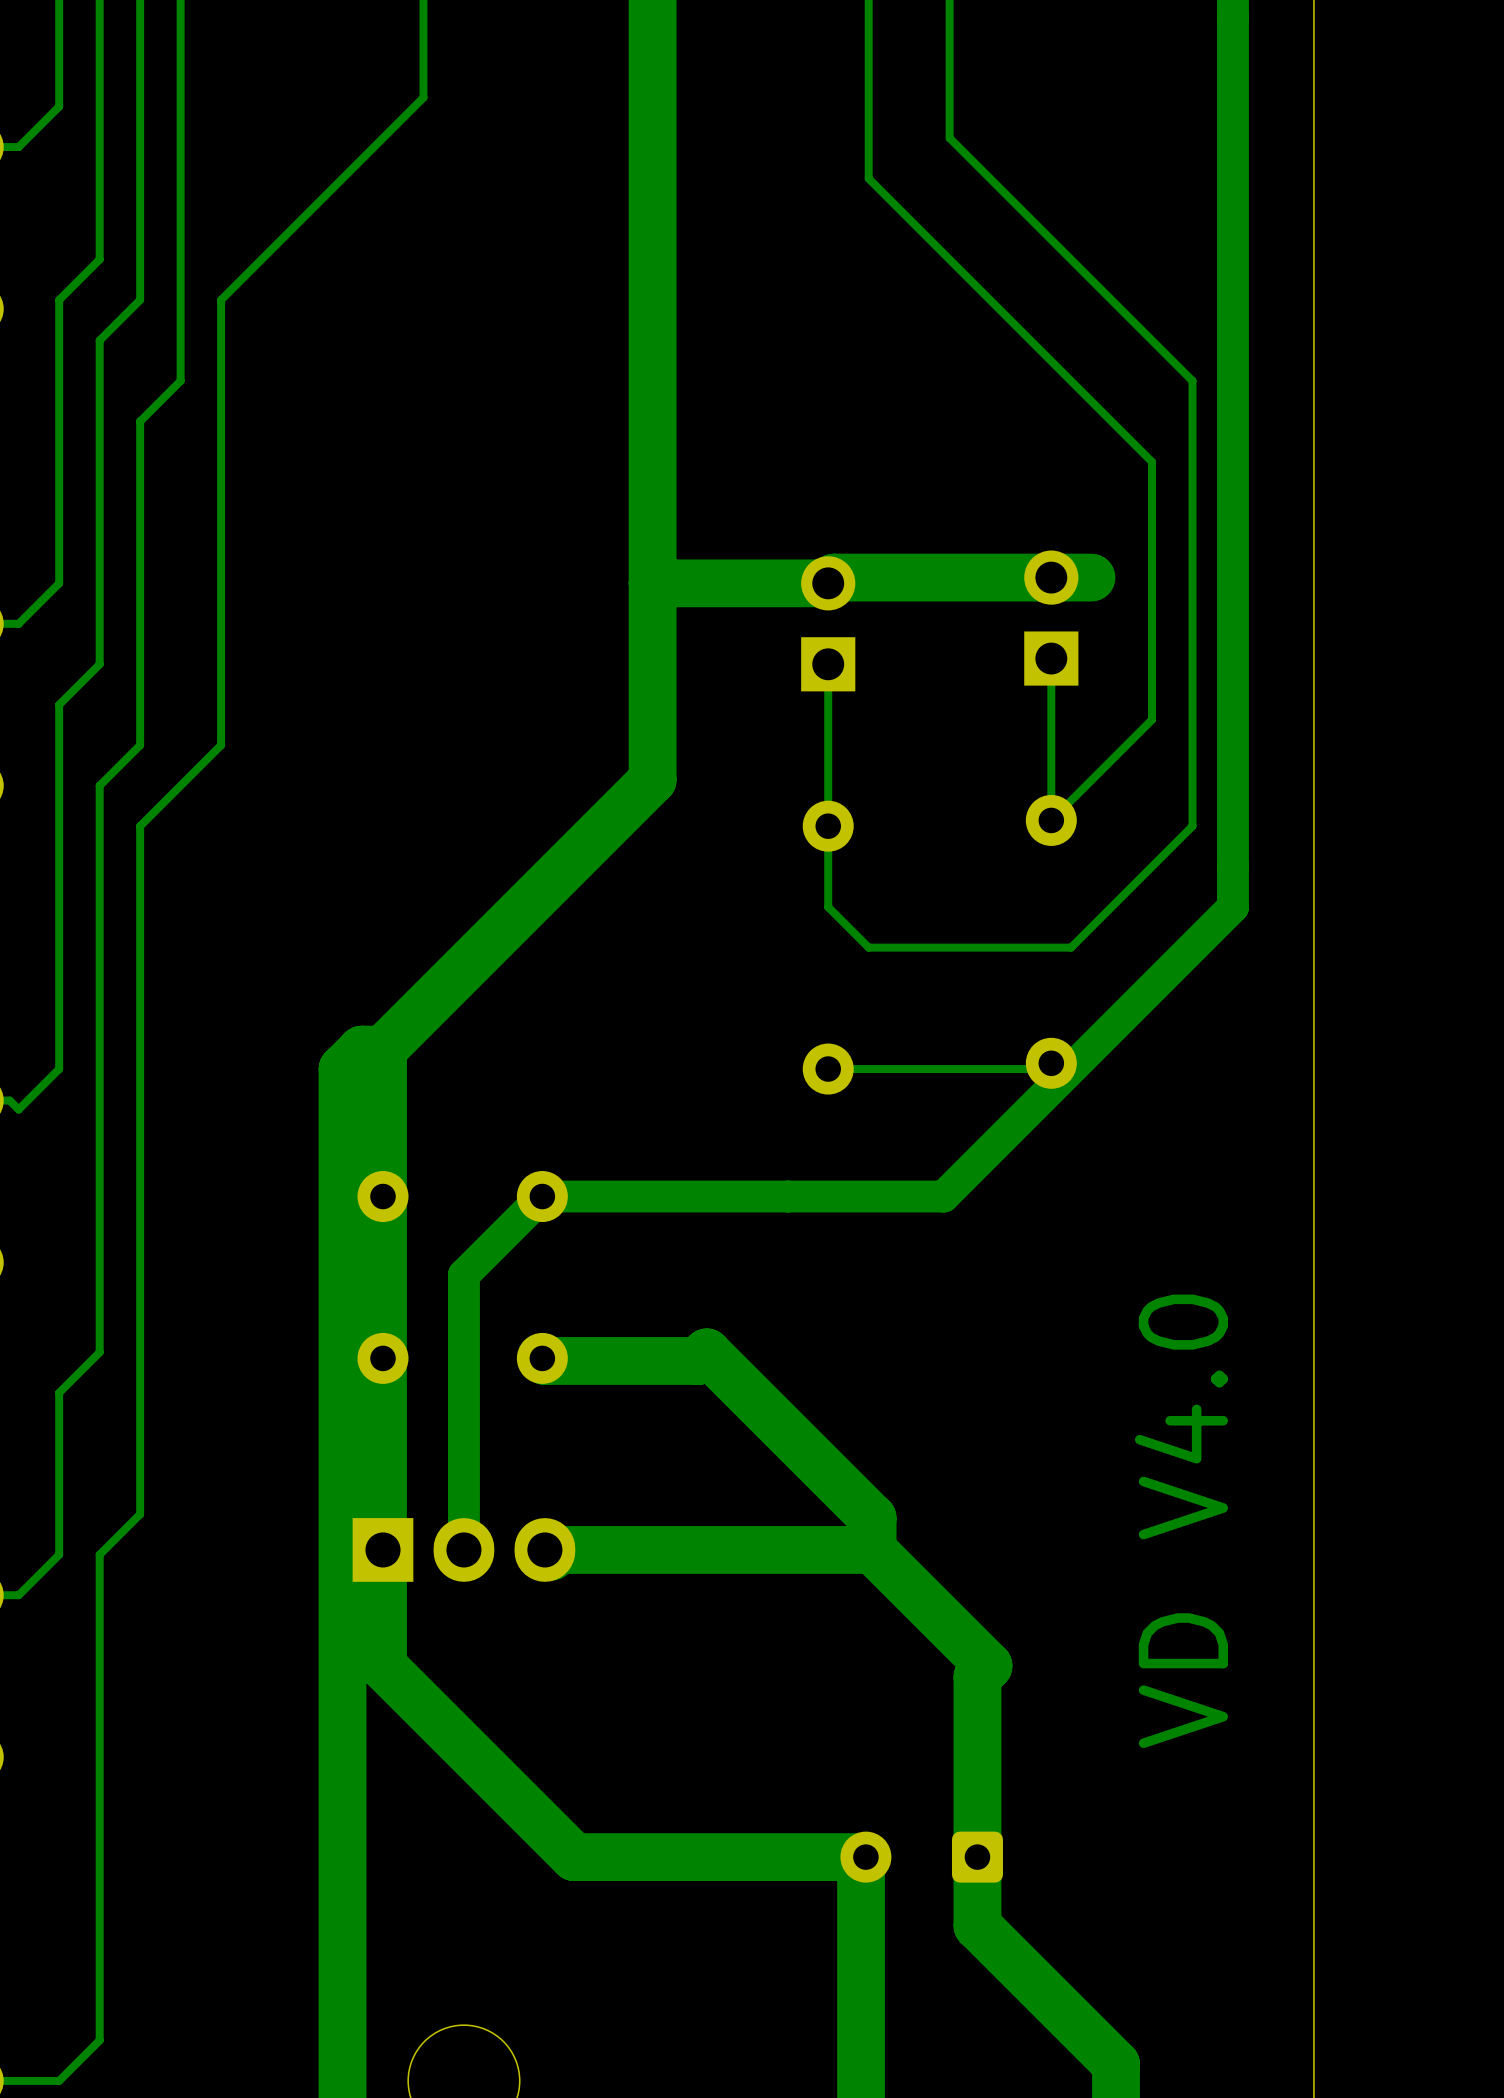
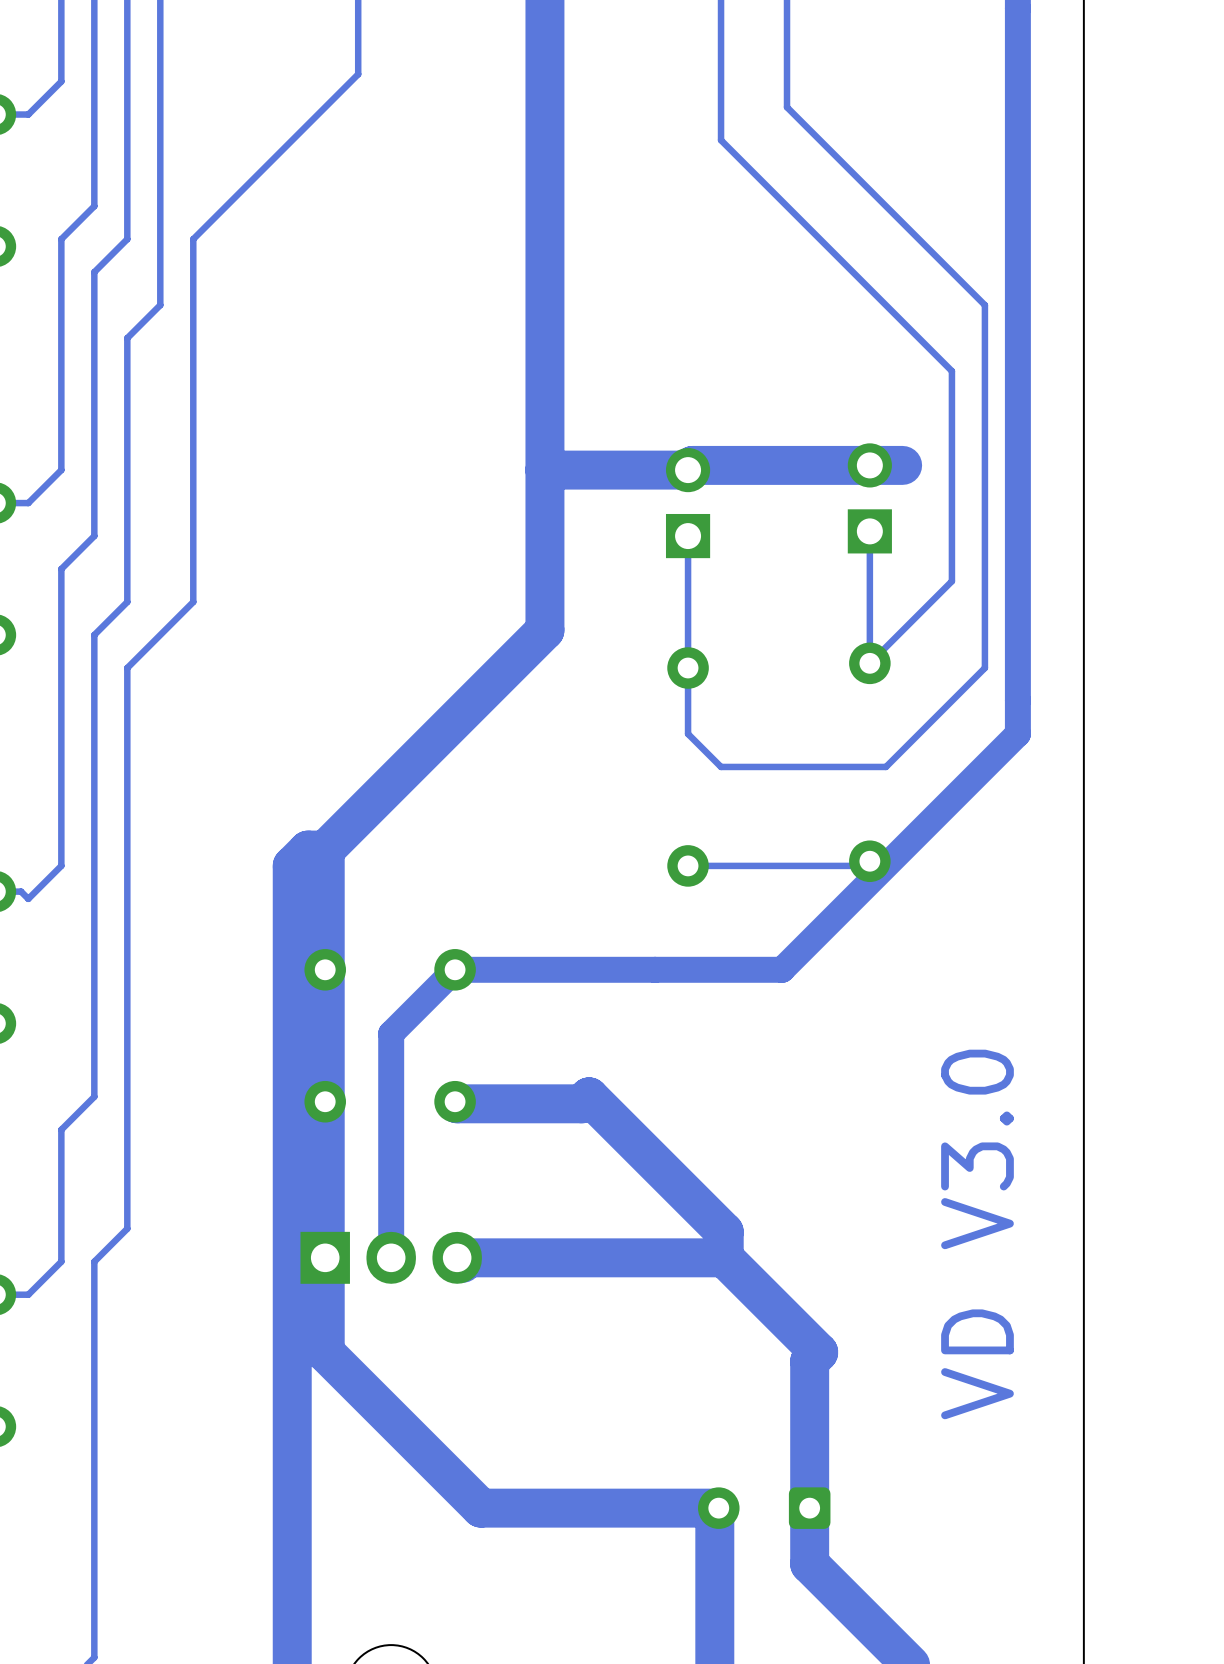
text: VD V4.0 (1181, 1521) -> VD V3.0 (977, 1234)

